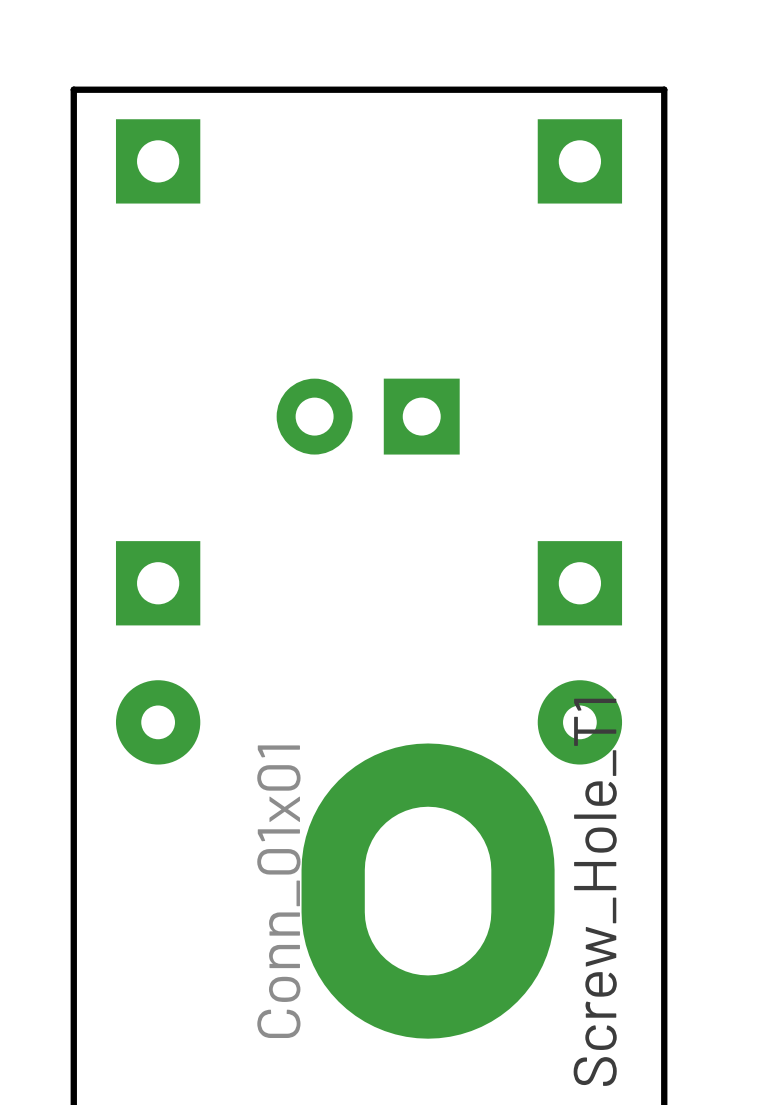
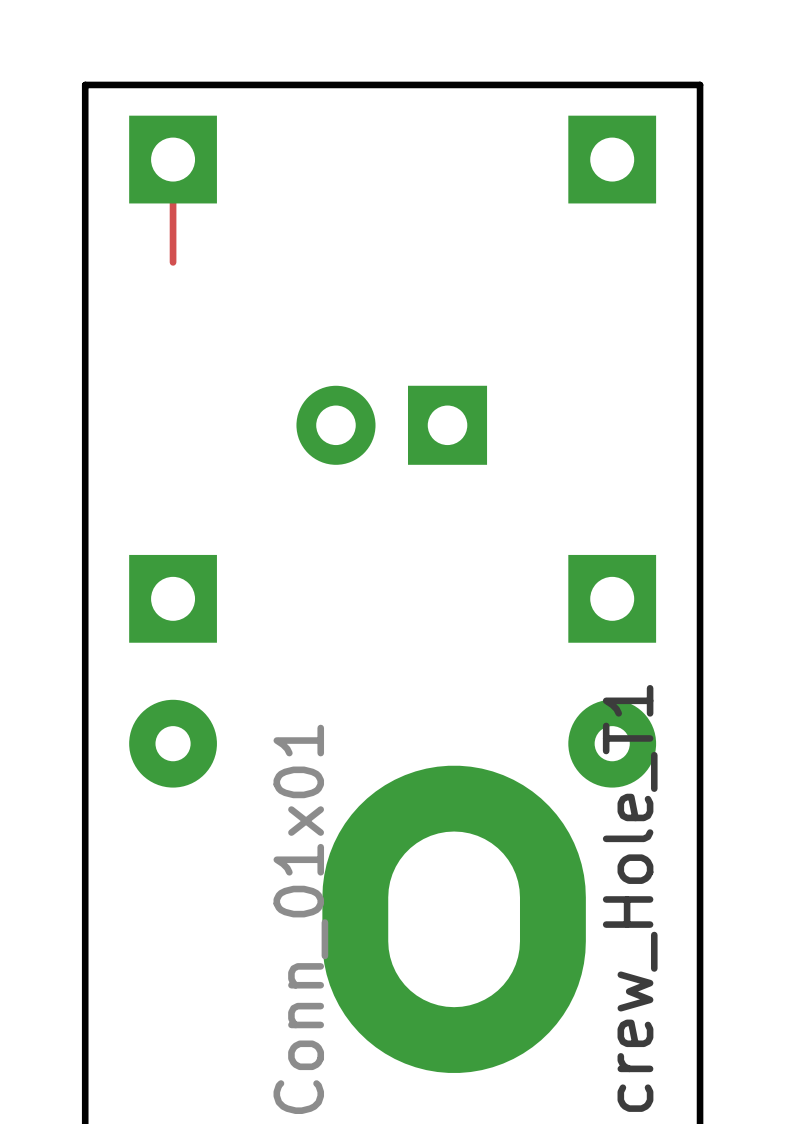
track: none -> (173, 159) (173, 262)

